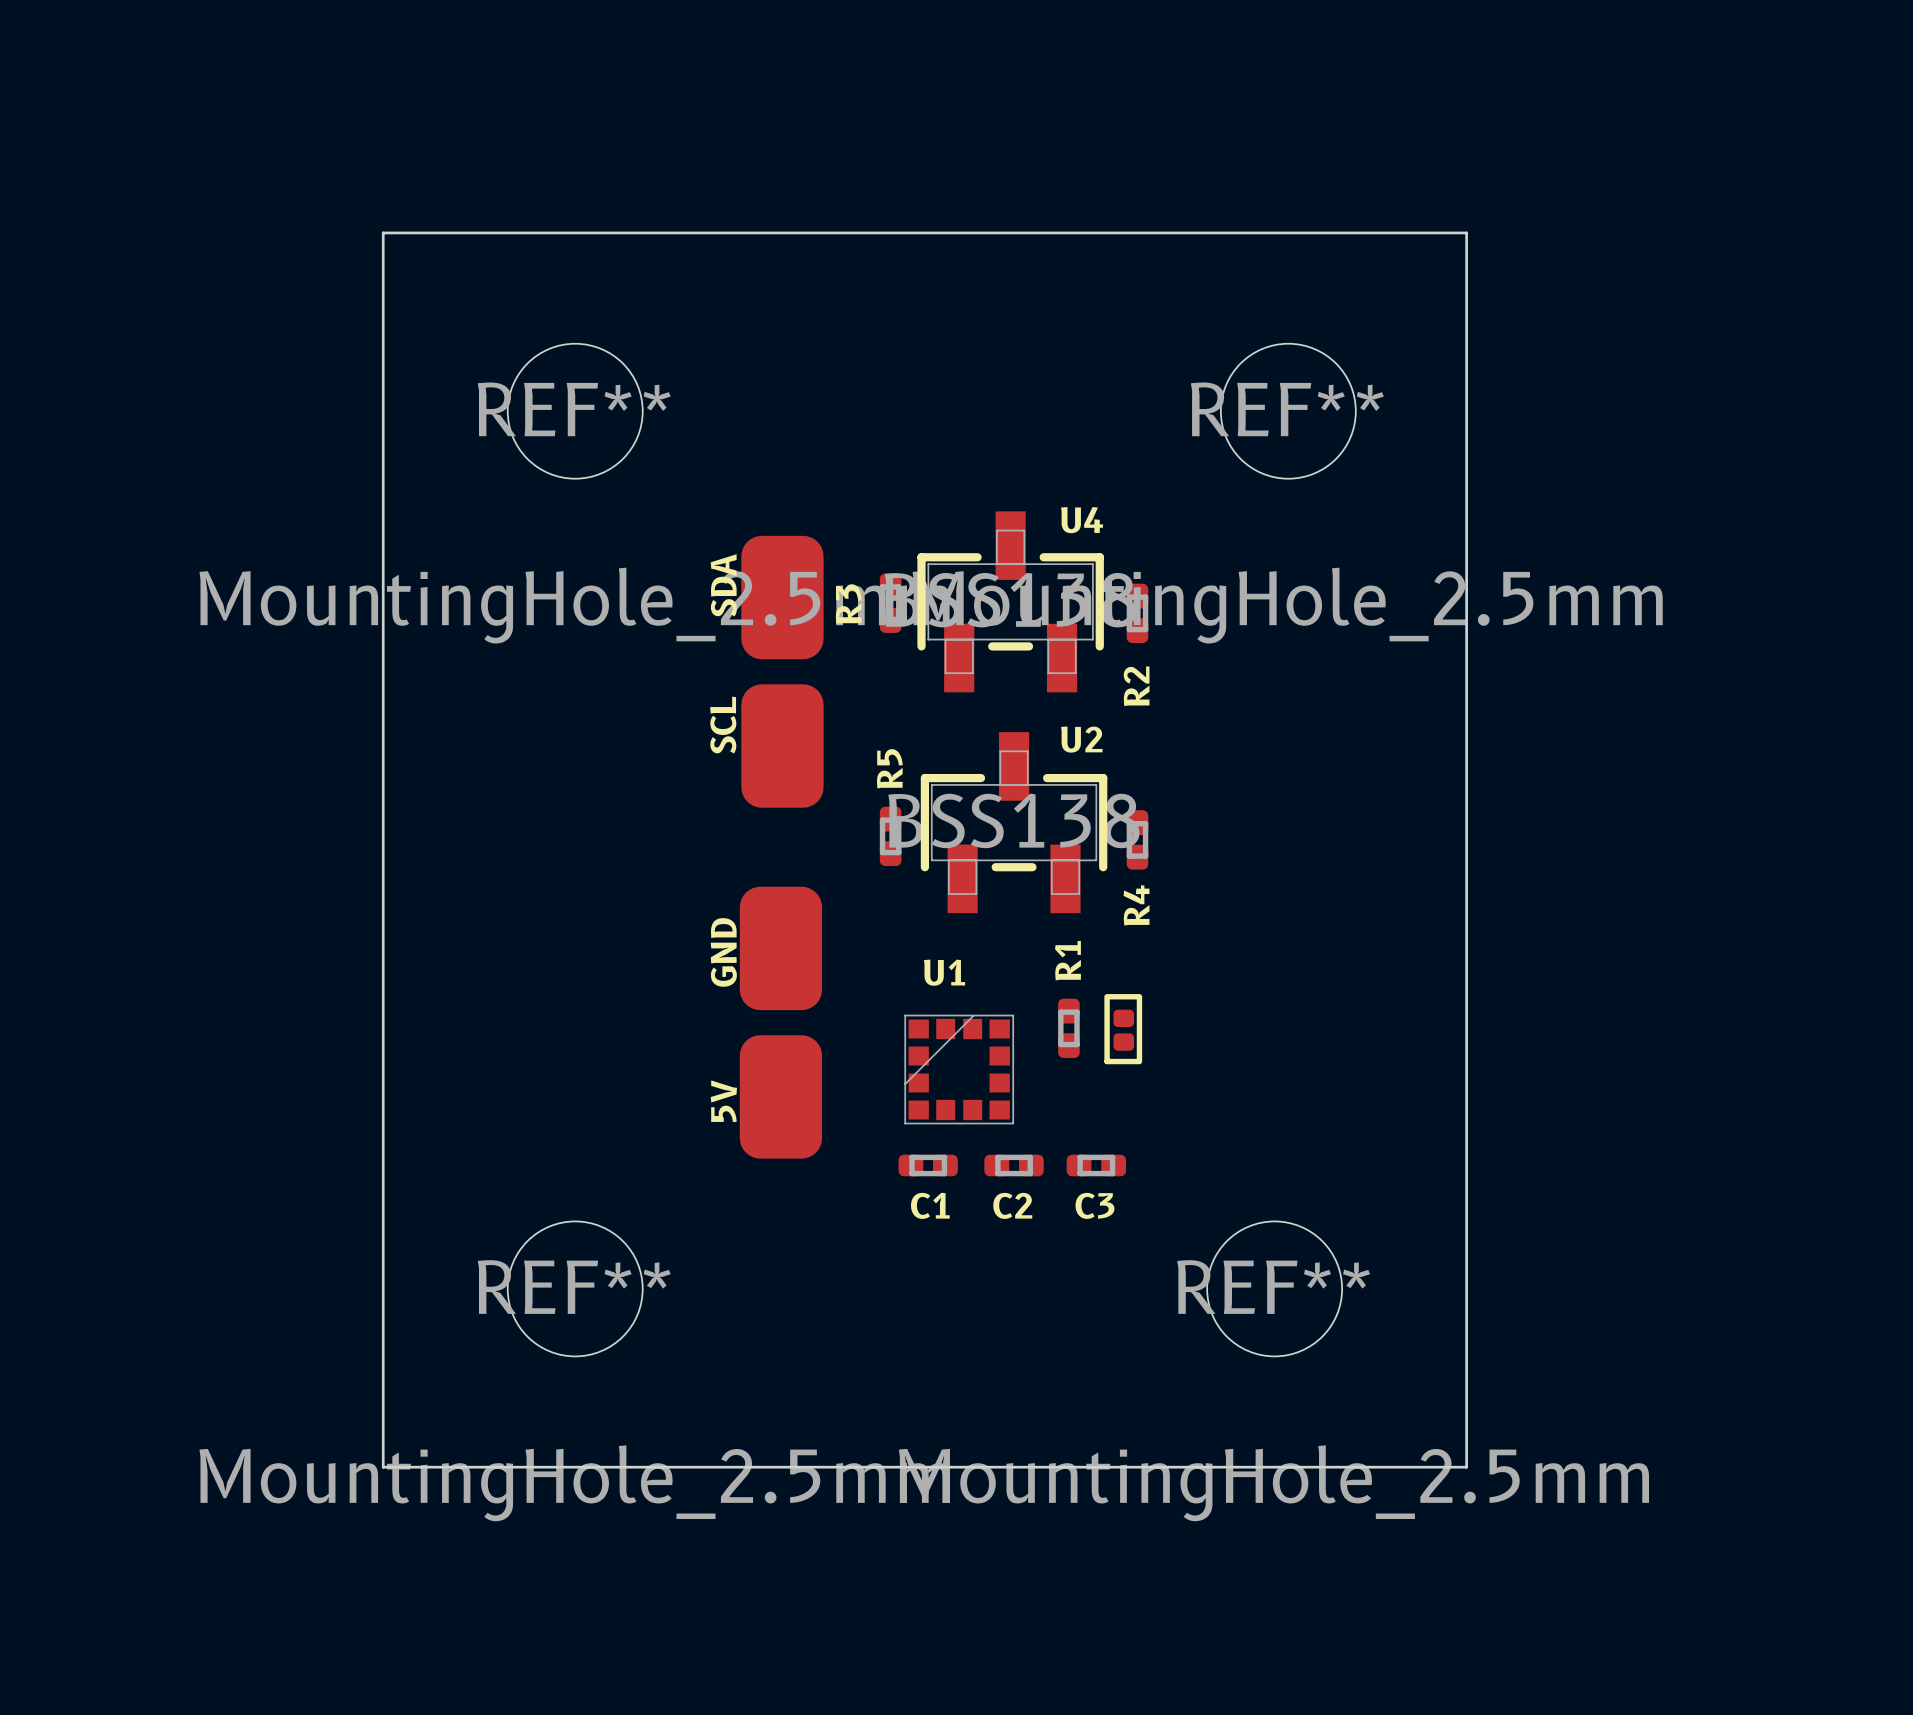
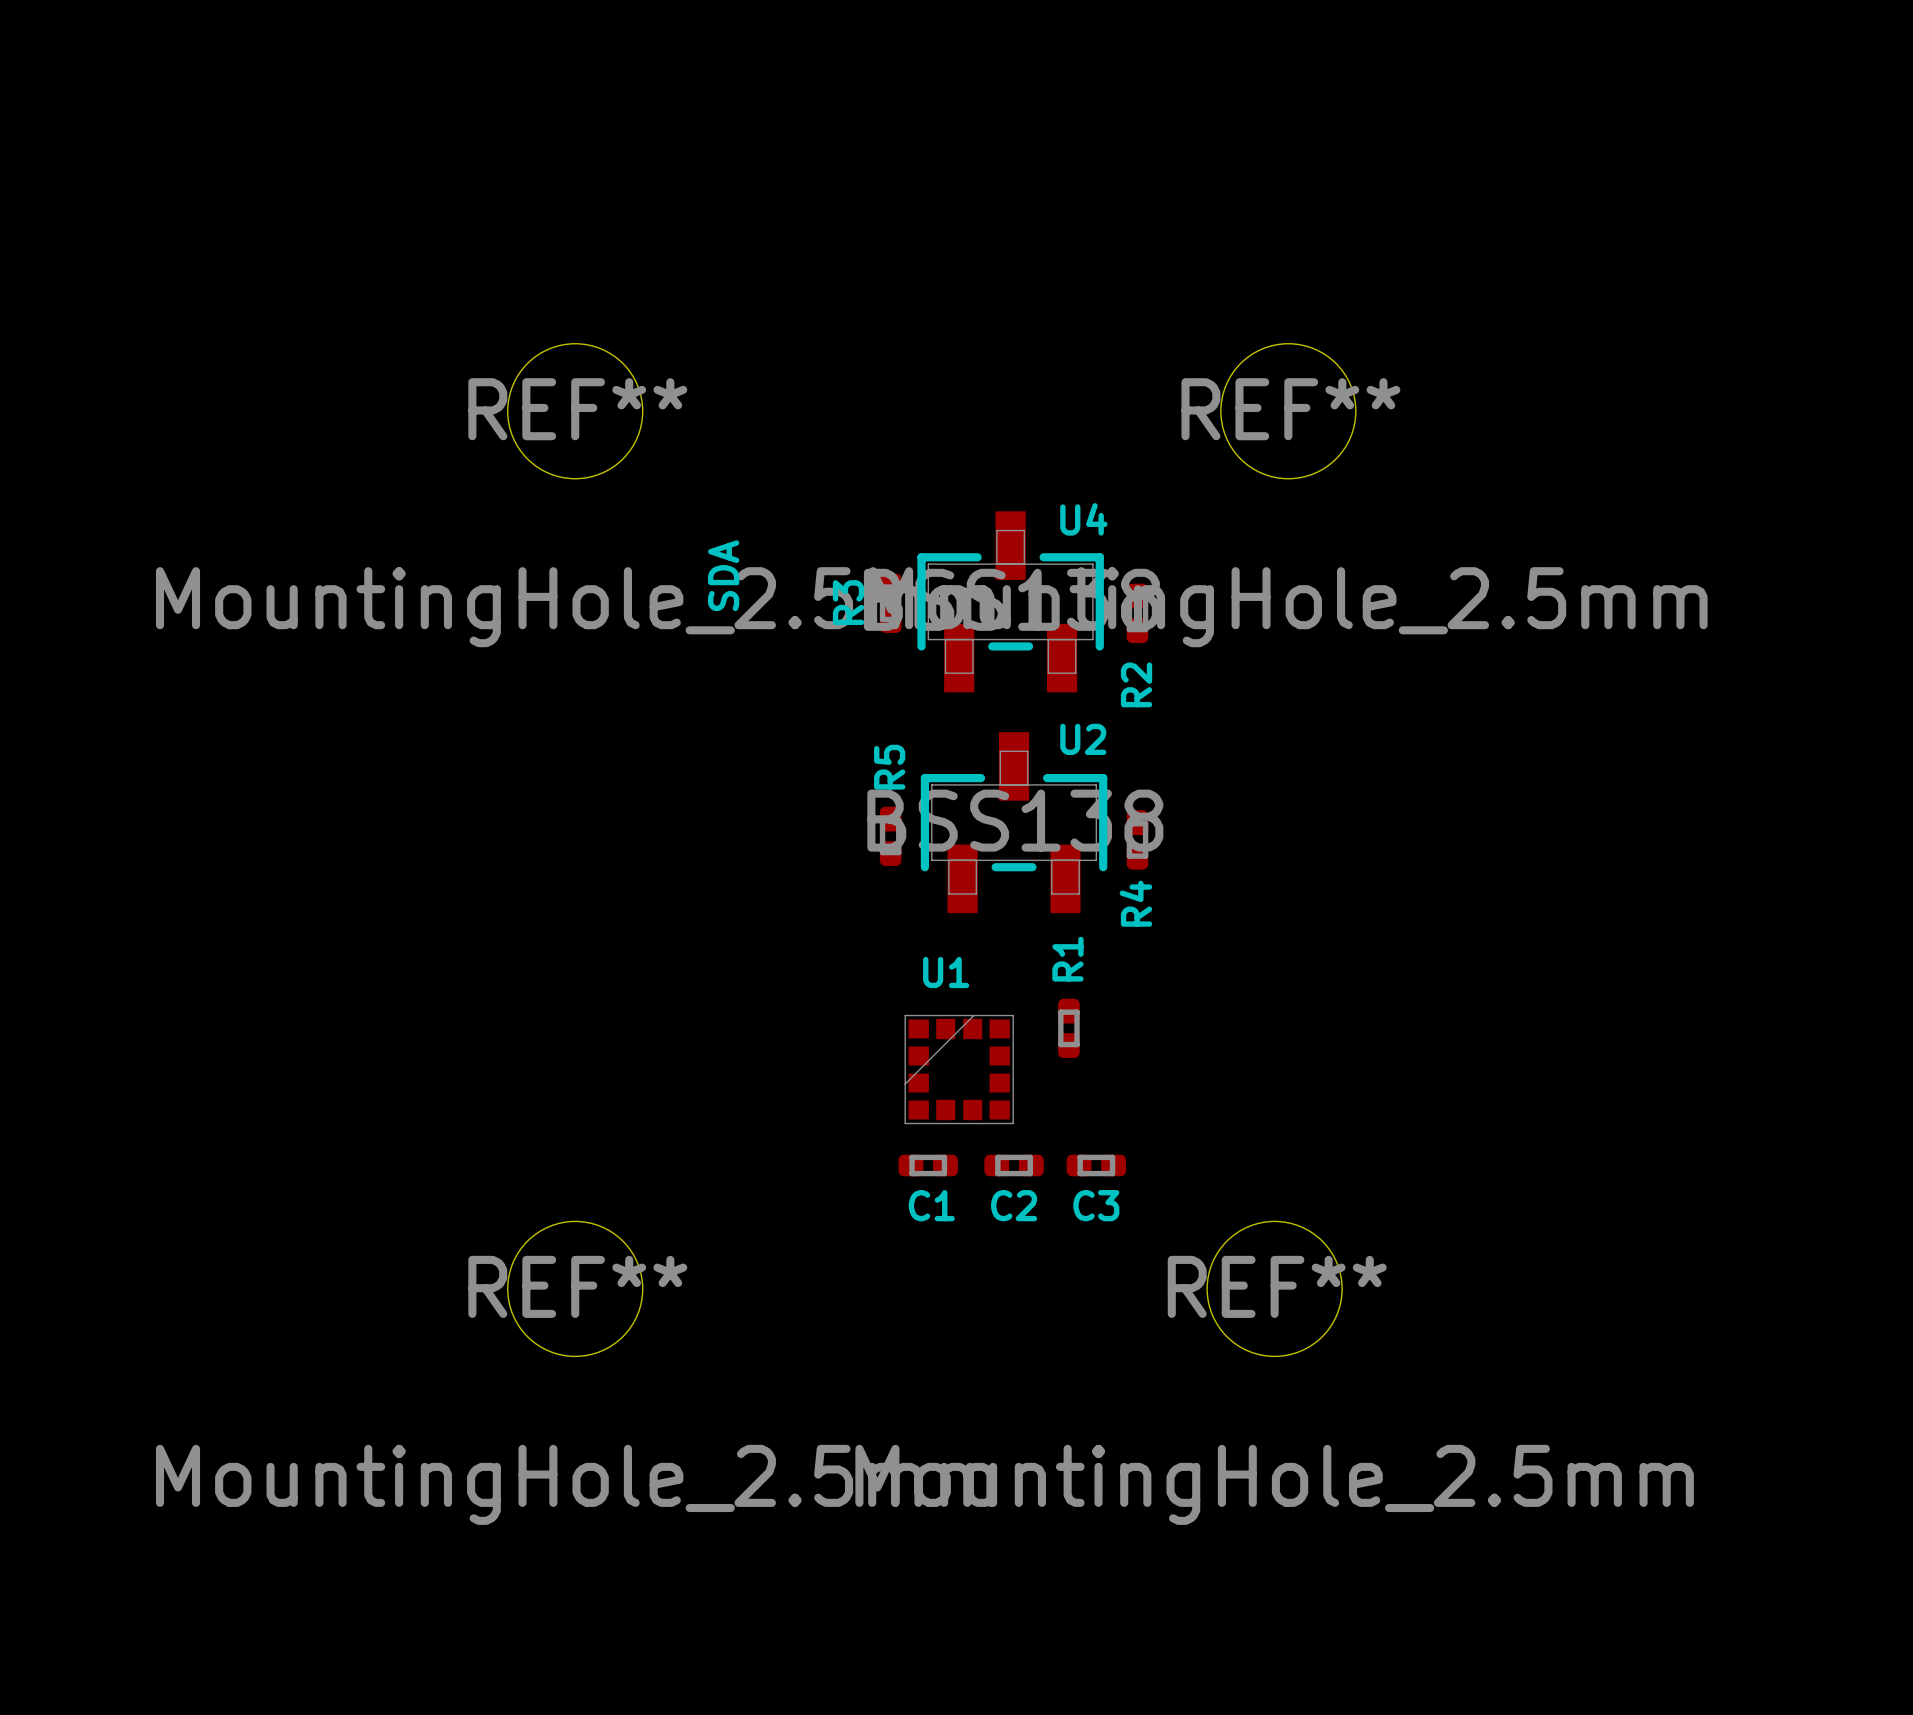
board edge: (383, 232) (1466, 232) (1466, 1467) (383, 1467) (383, 232) -> none
part: (782, 671) -> none
text: SCL (723, 725) -> none
text: GND (723, 952) -> none
part: (780, 1022) -> none
part: (1123, 1029) -> none
text: 5V (723, 1101) -> none

